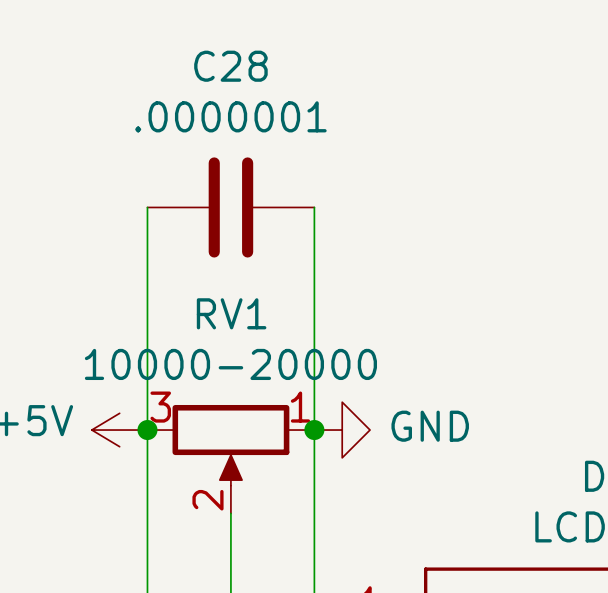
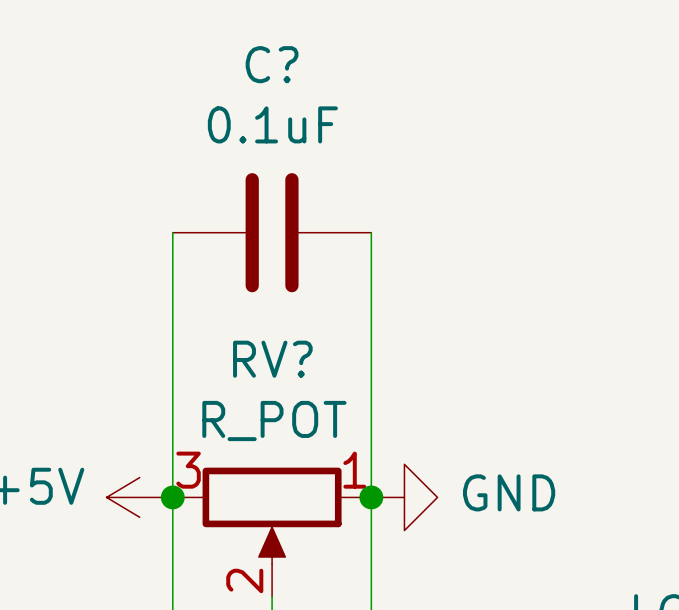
C28 name: C28 (230, 66) -> C? (272, 64)
C28 value: .0000001 (230, 116) -> 0.1uF (272, 124)
RV1 name: RV1 (231, 313) -> RV? (272, 359)
RV1 value: 10000-20000 (230, 364) -> R_POT (274, 421)

